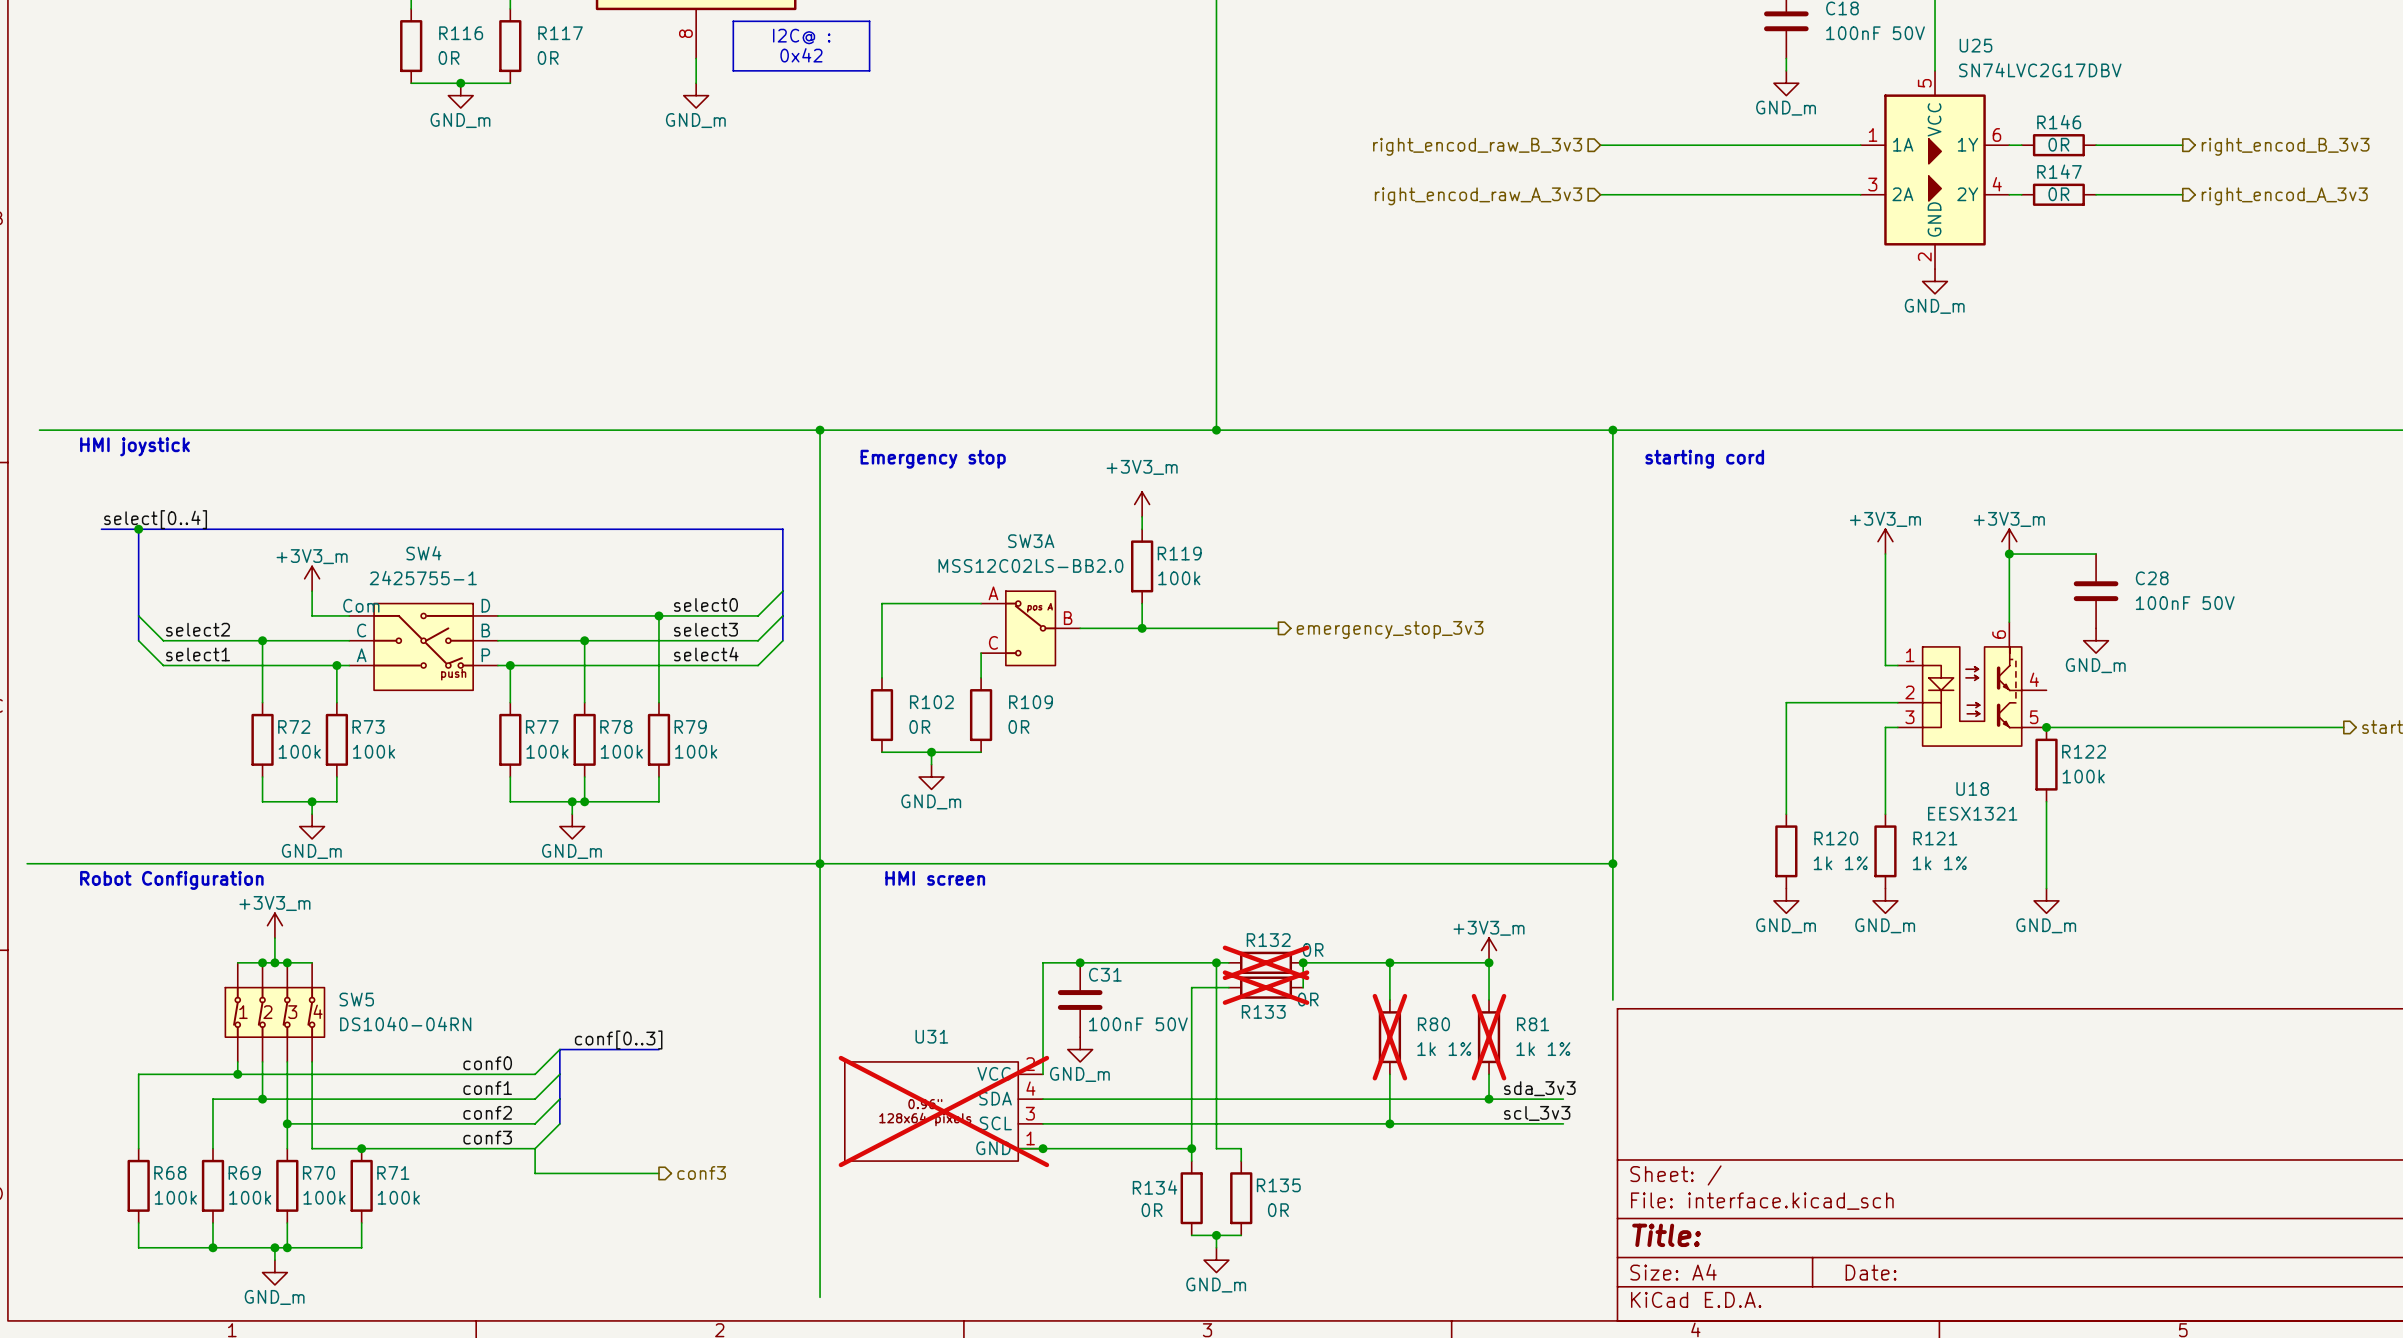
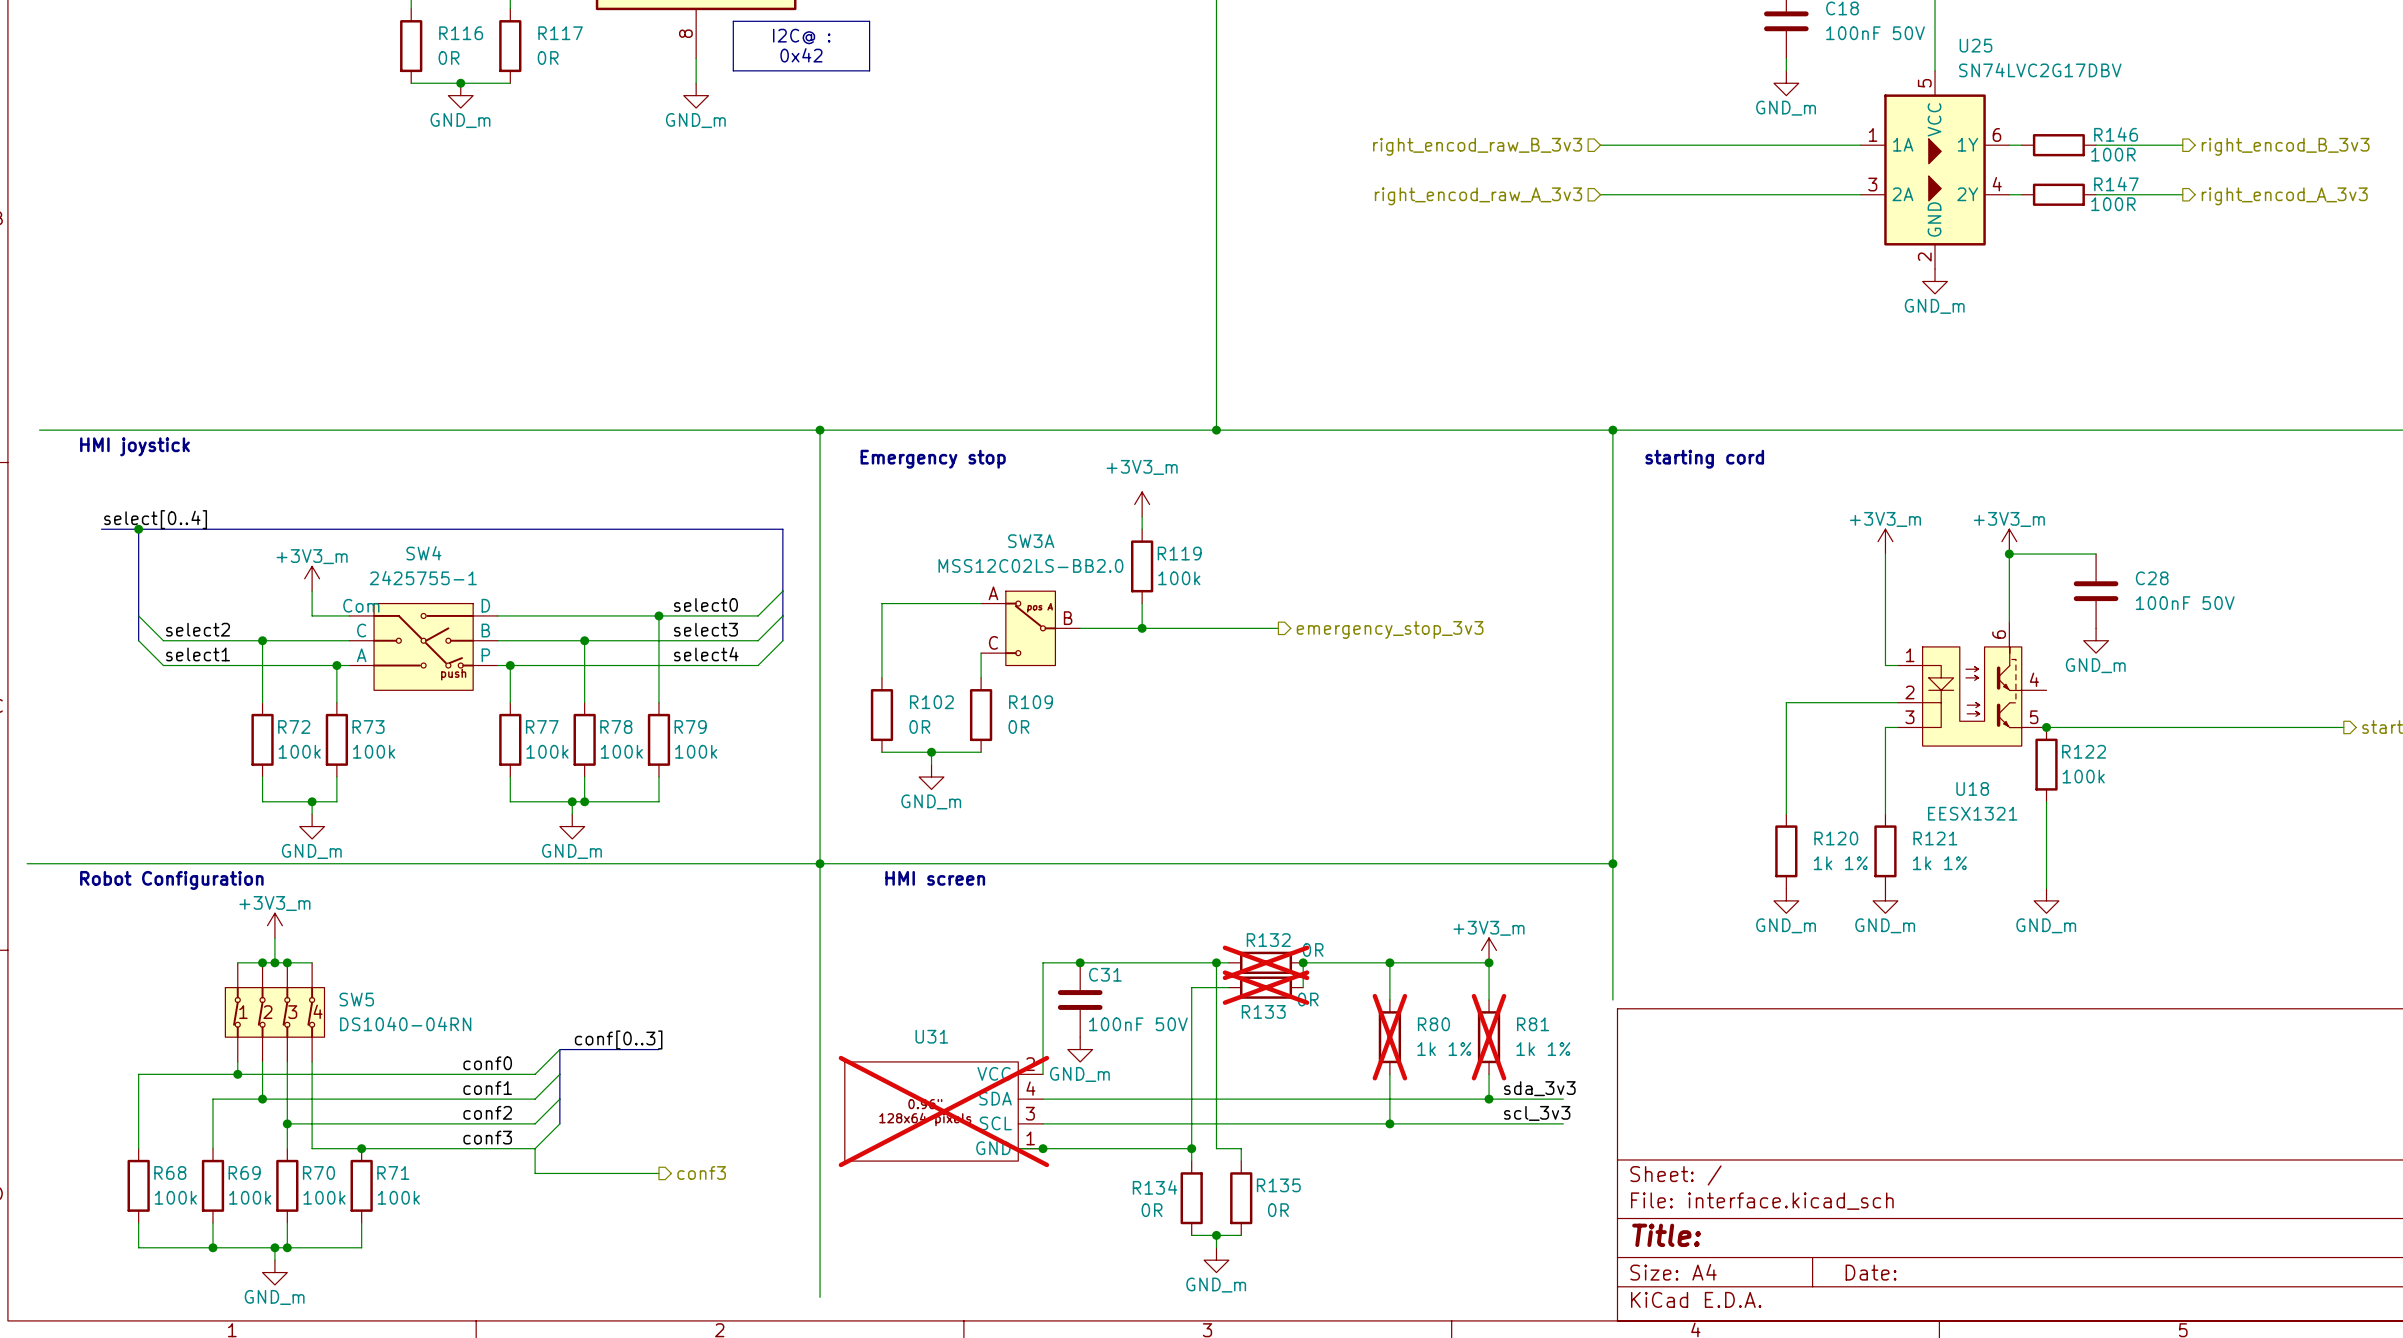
R146 name position: R146 (2059, 122) -> R146 (2116, 134)
R146 value: 0R (2058, 144) -> 100R (2113, 154)
R147 name position: R147 (2059, 171) -> R147 (2116, 184)
R147 value: 0R (2058, 194) -> 100R (2113, 204)

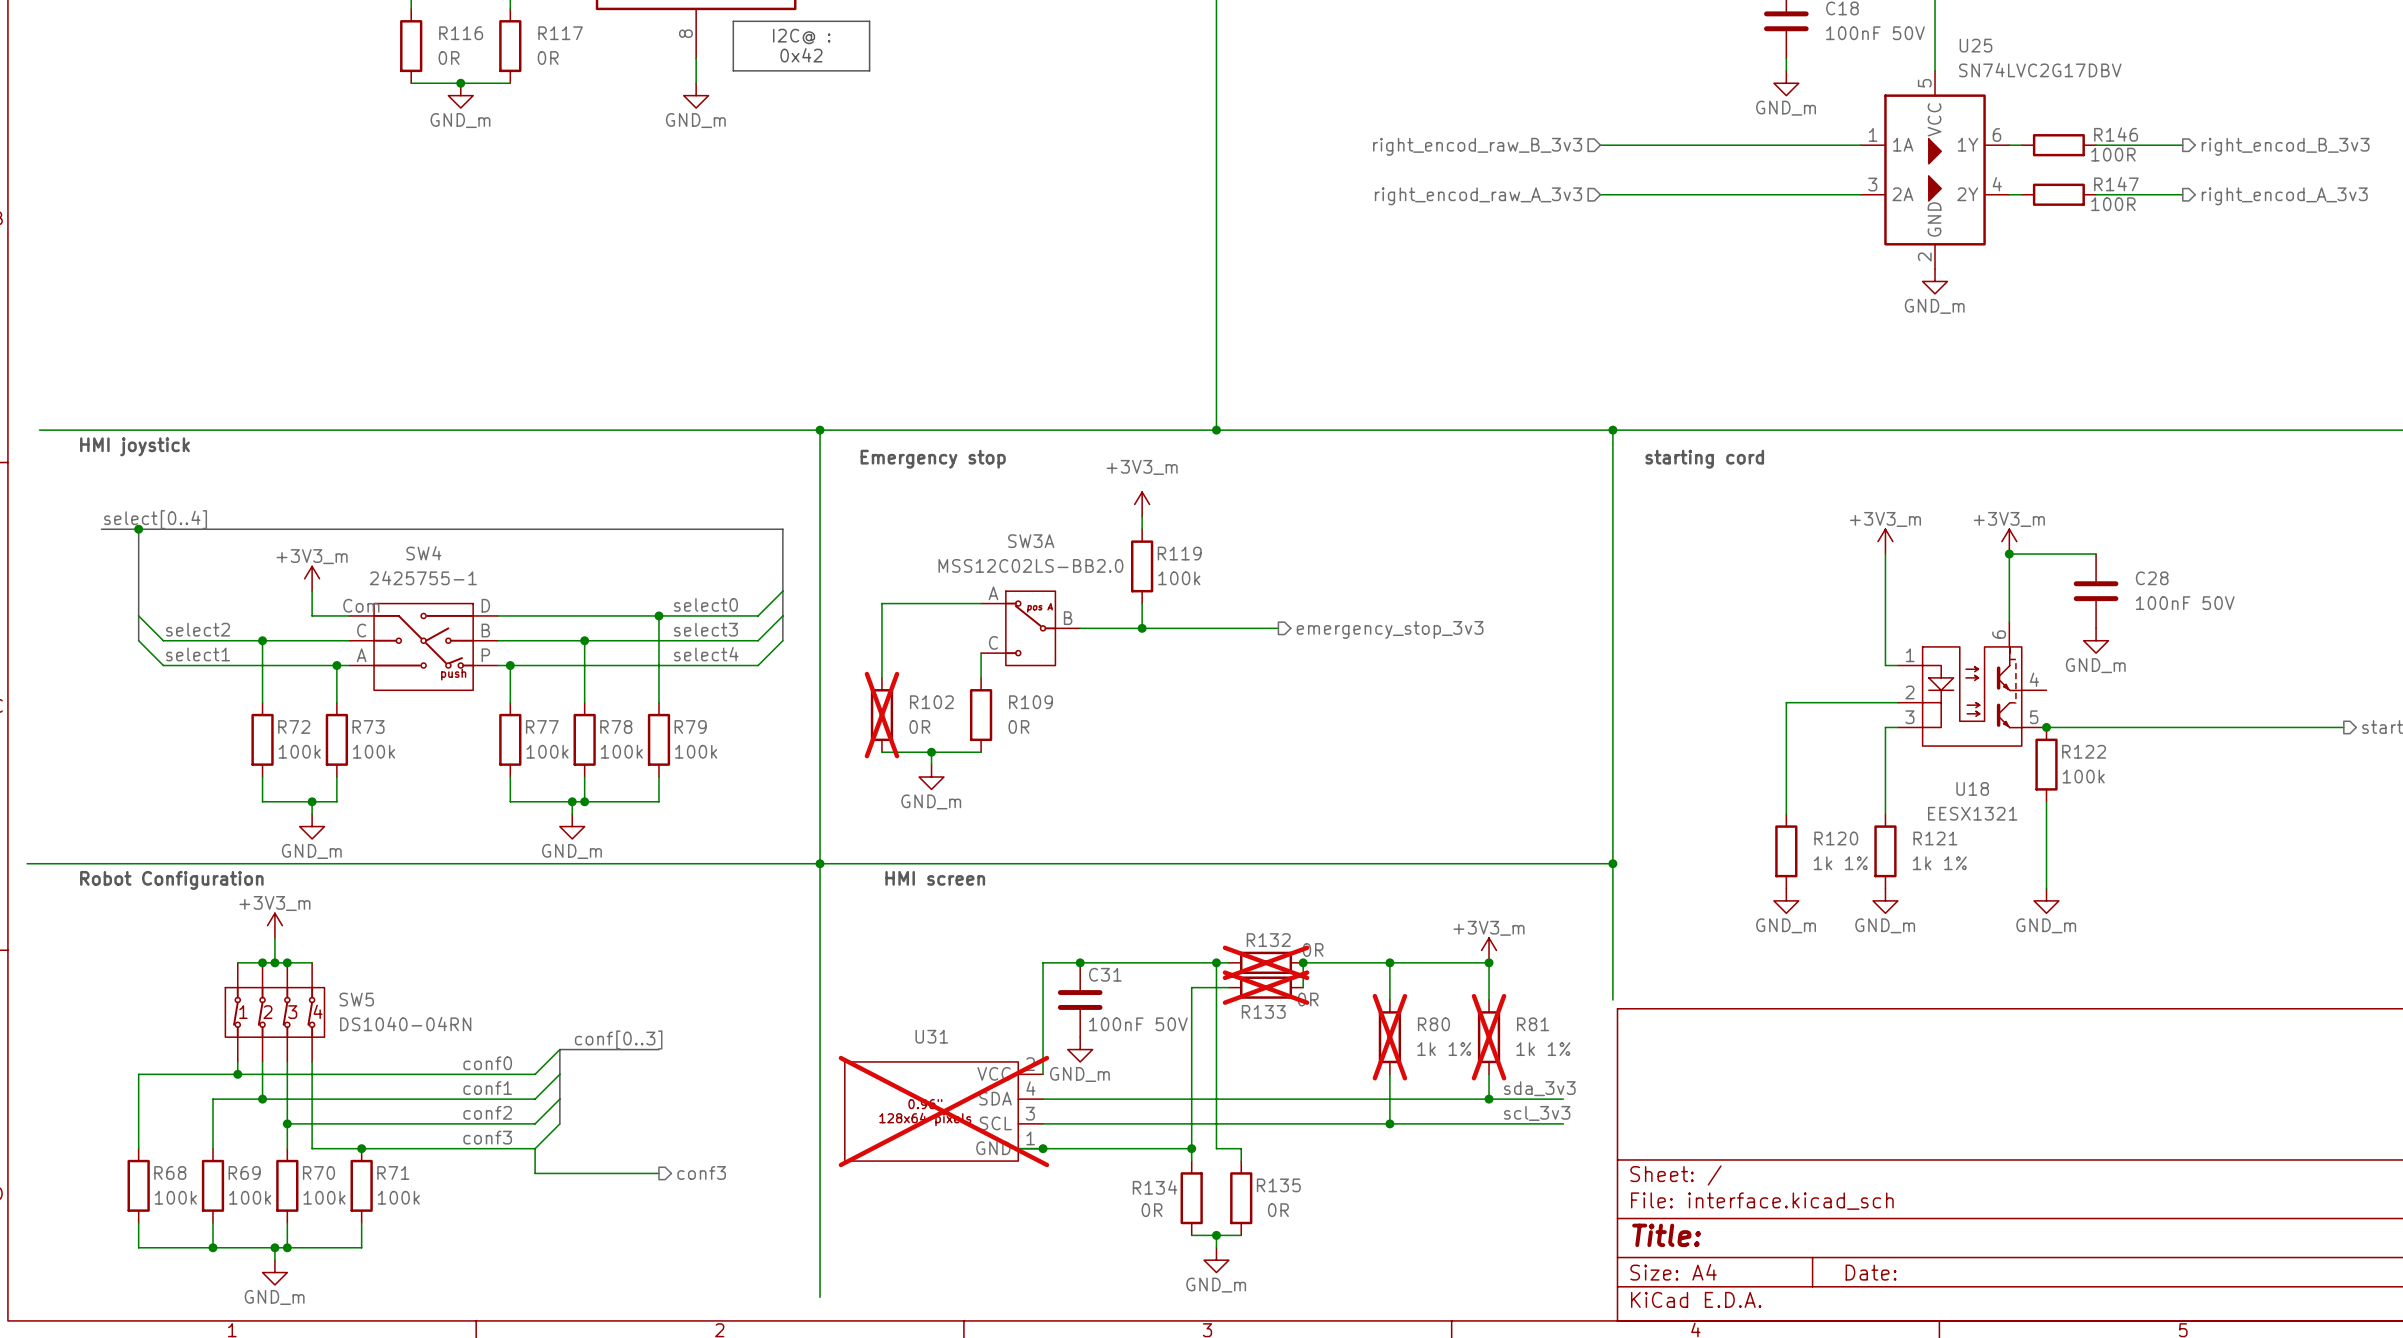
R102 do-not-place cross: none -> (881, 715)

